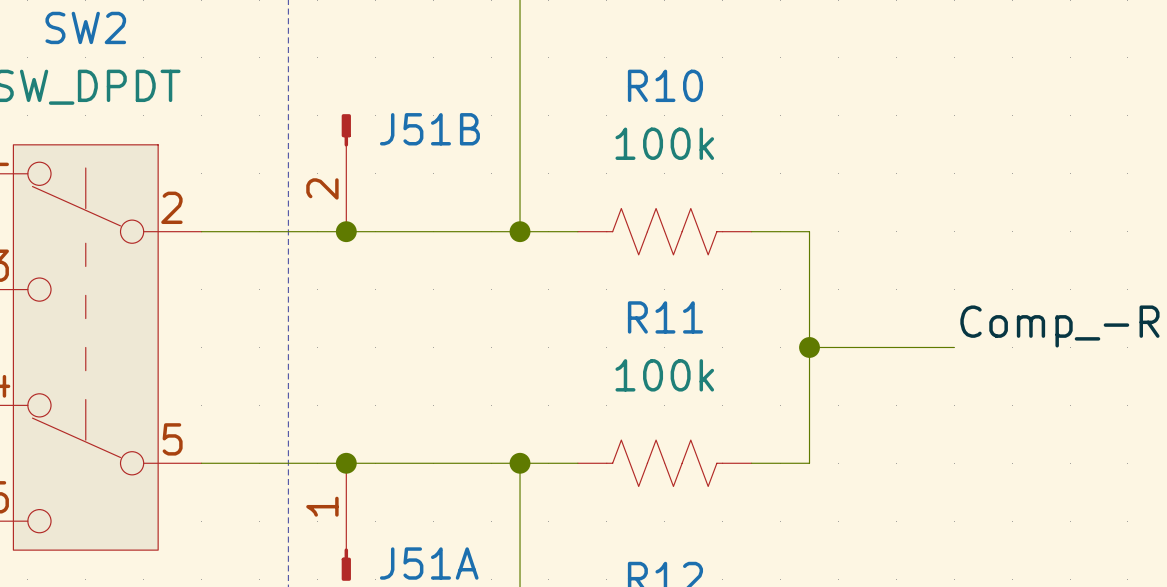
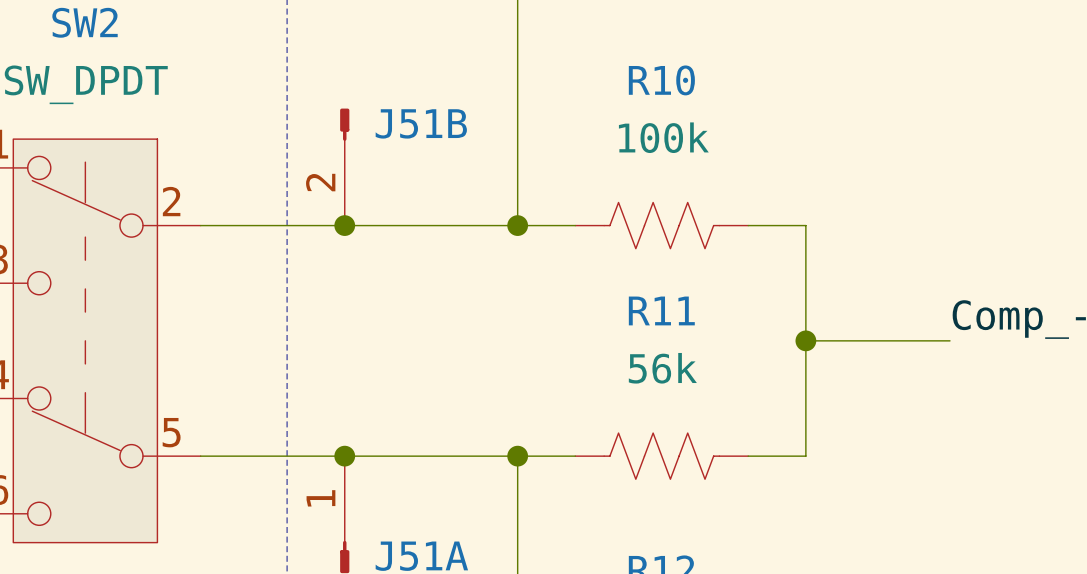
R11 value: 100k (664, 375) -> 56k (662, 368)

